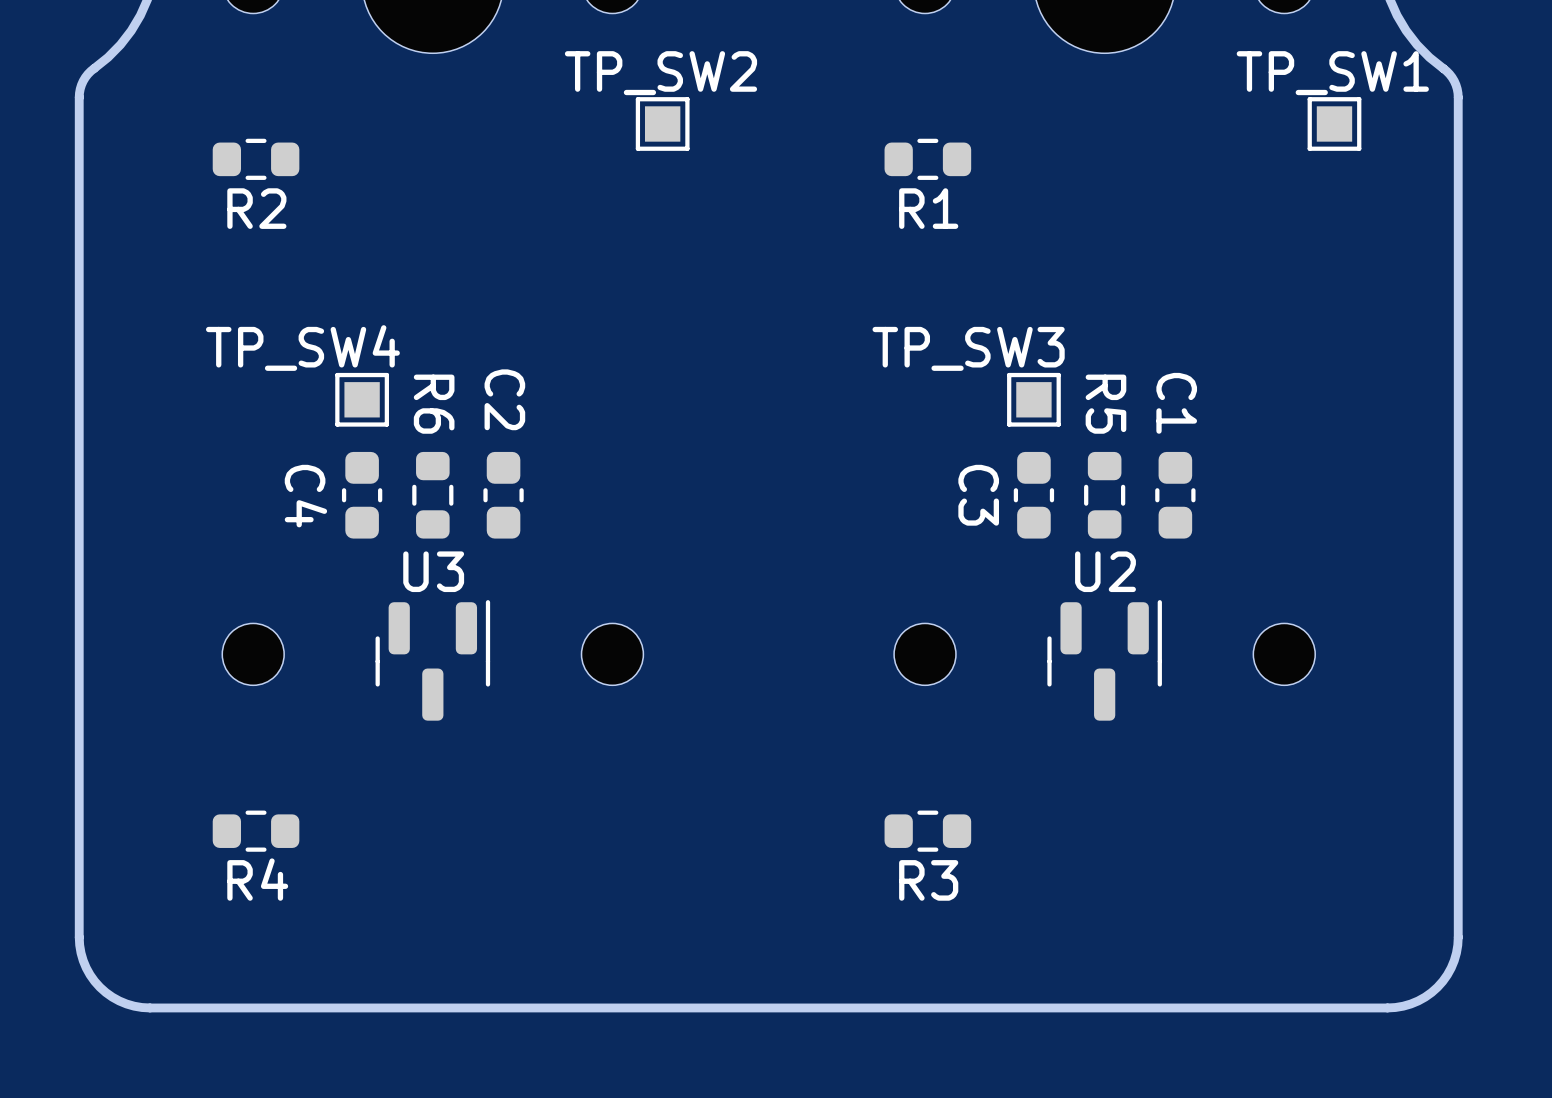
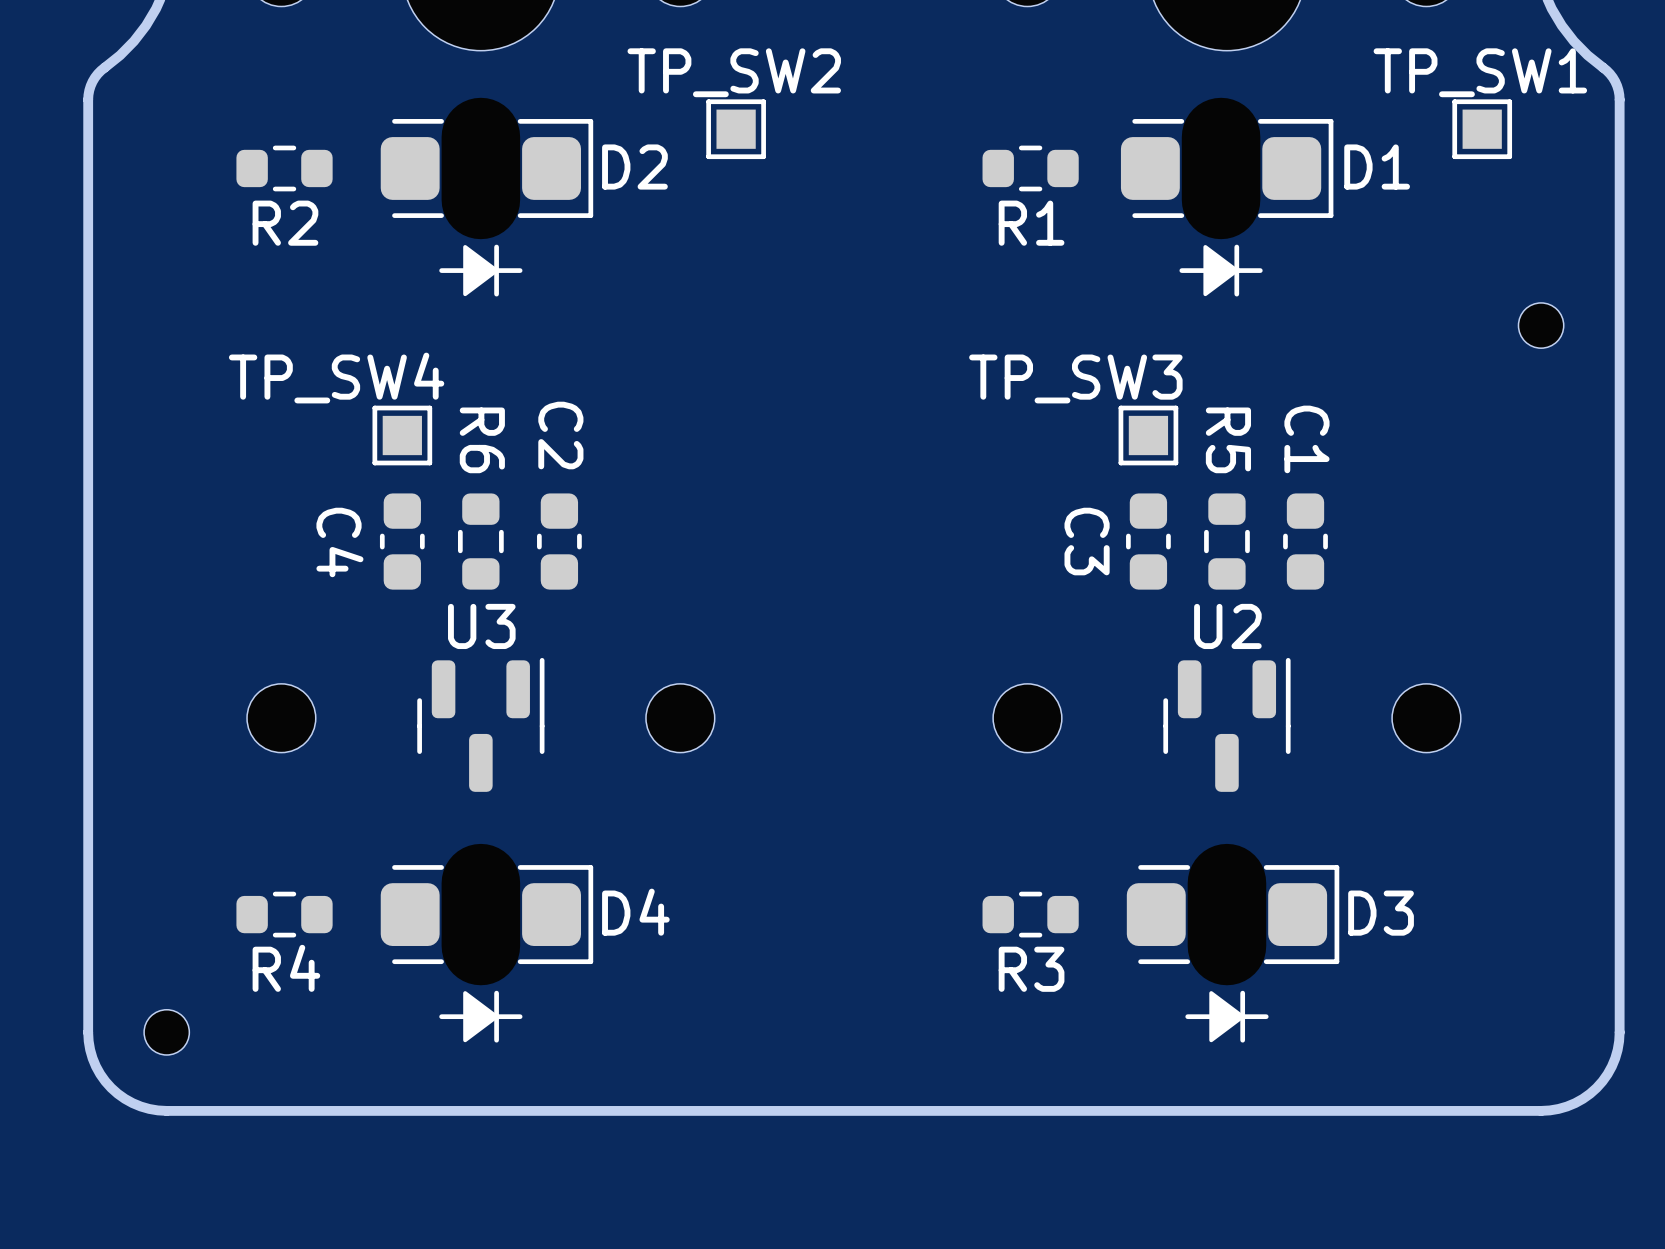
D2: none -> (486, 197)
D1: none -> (1227, 197)
part: none -> (1541, 325)
D4: none -> (486, 943)
D3: none -> (1233, 943)
part: none -> (166, 1032)

